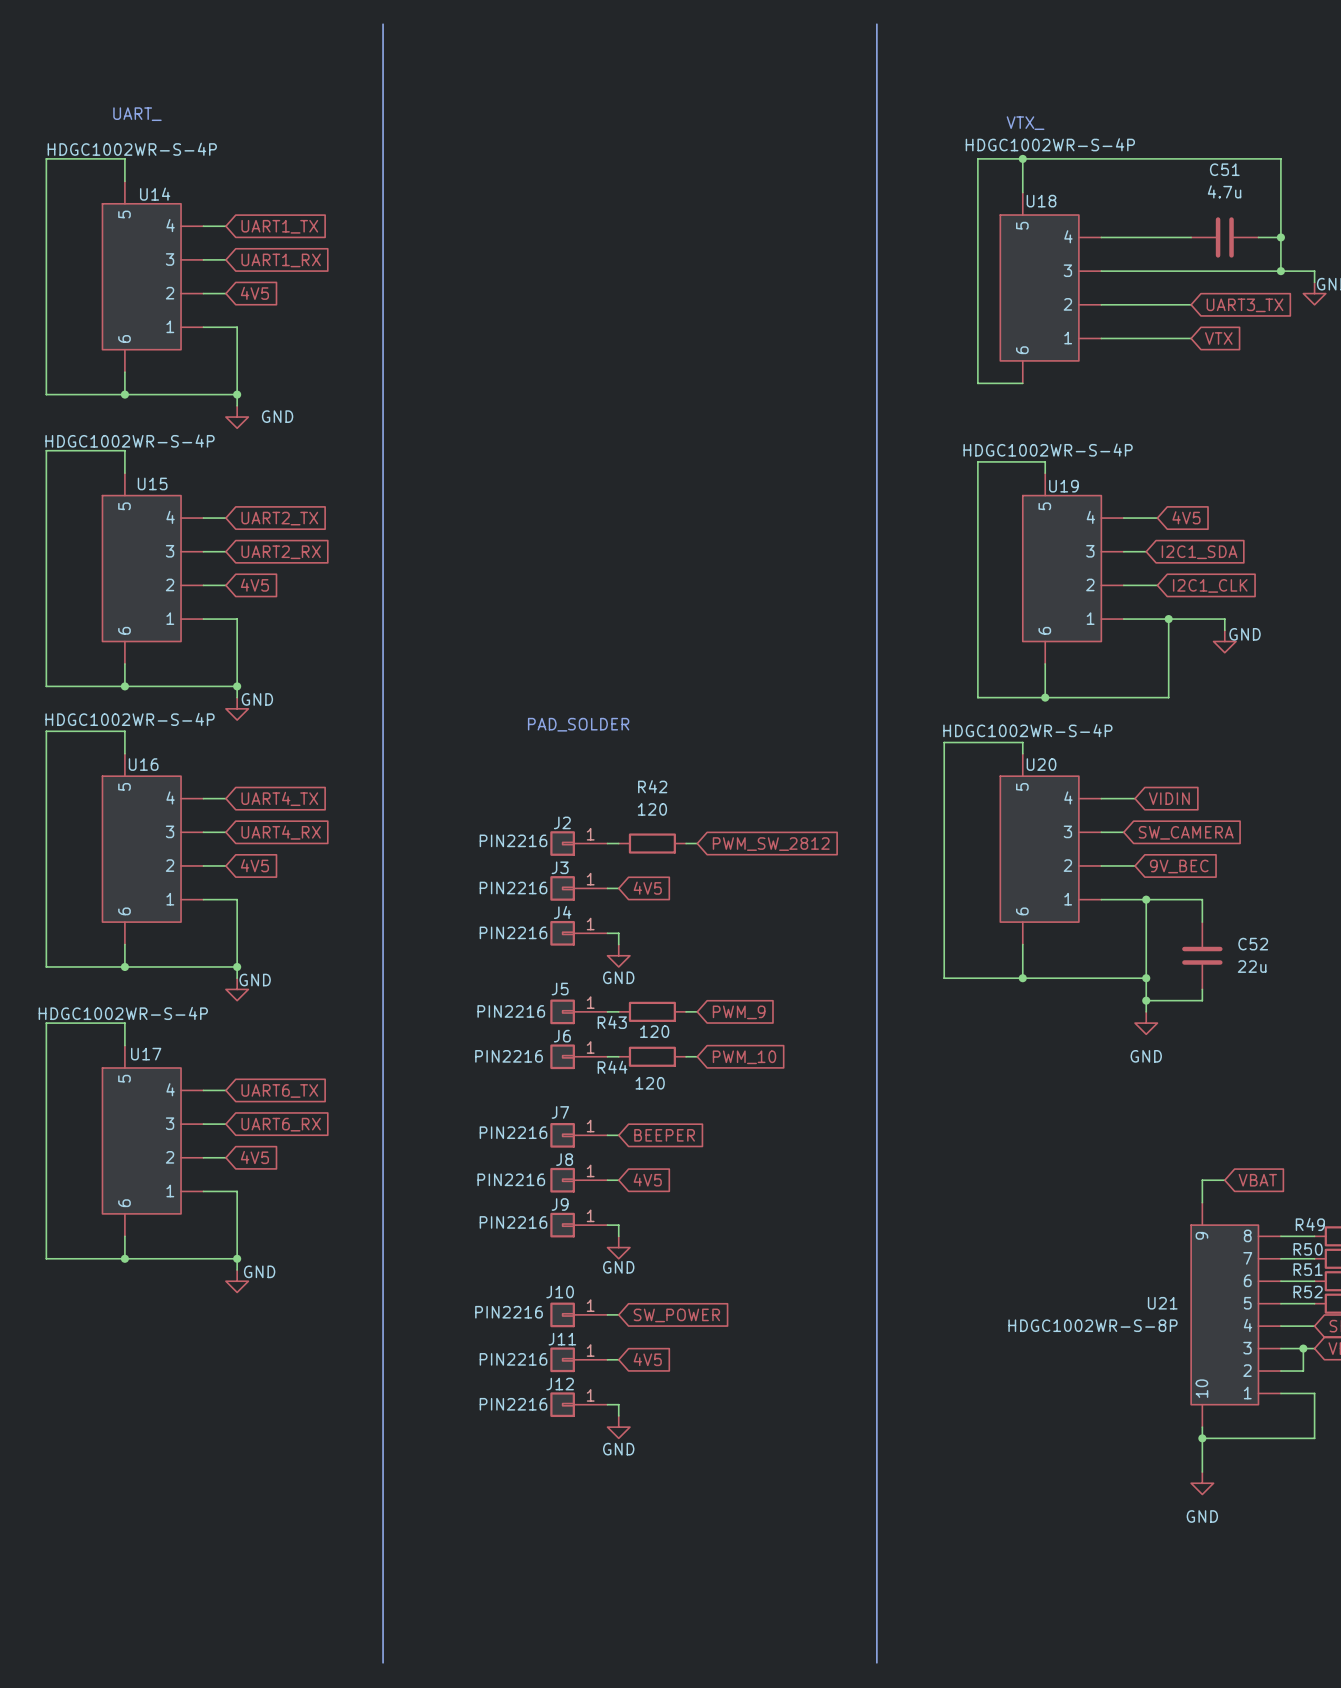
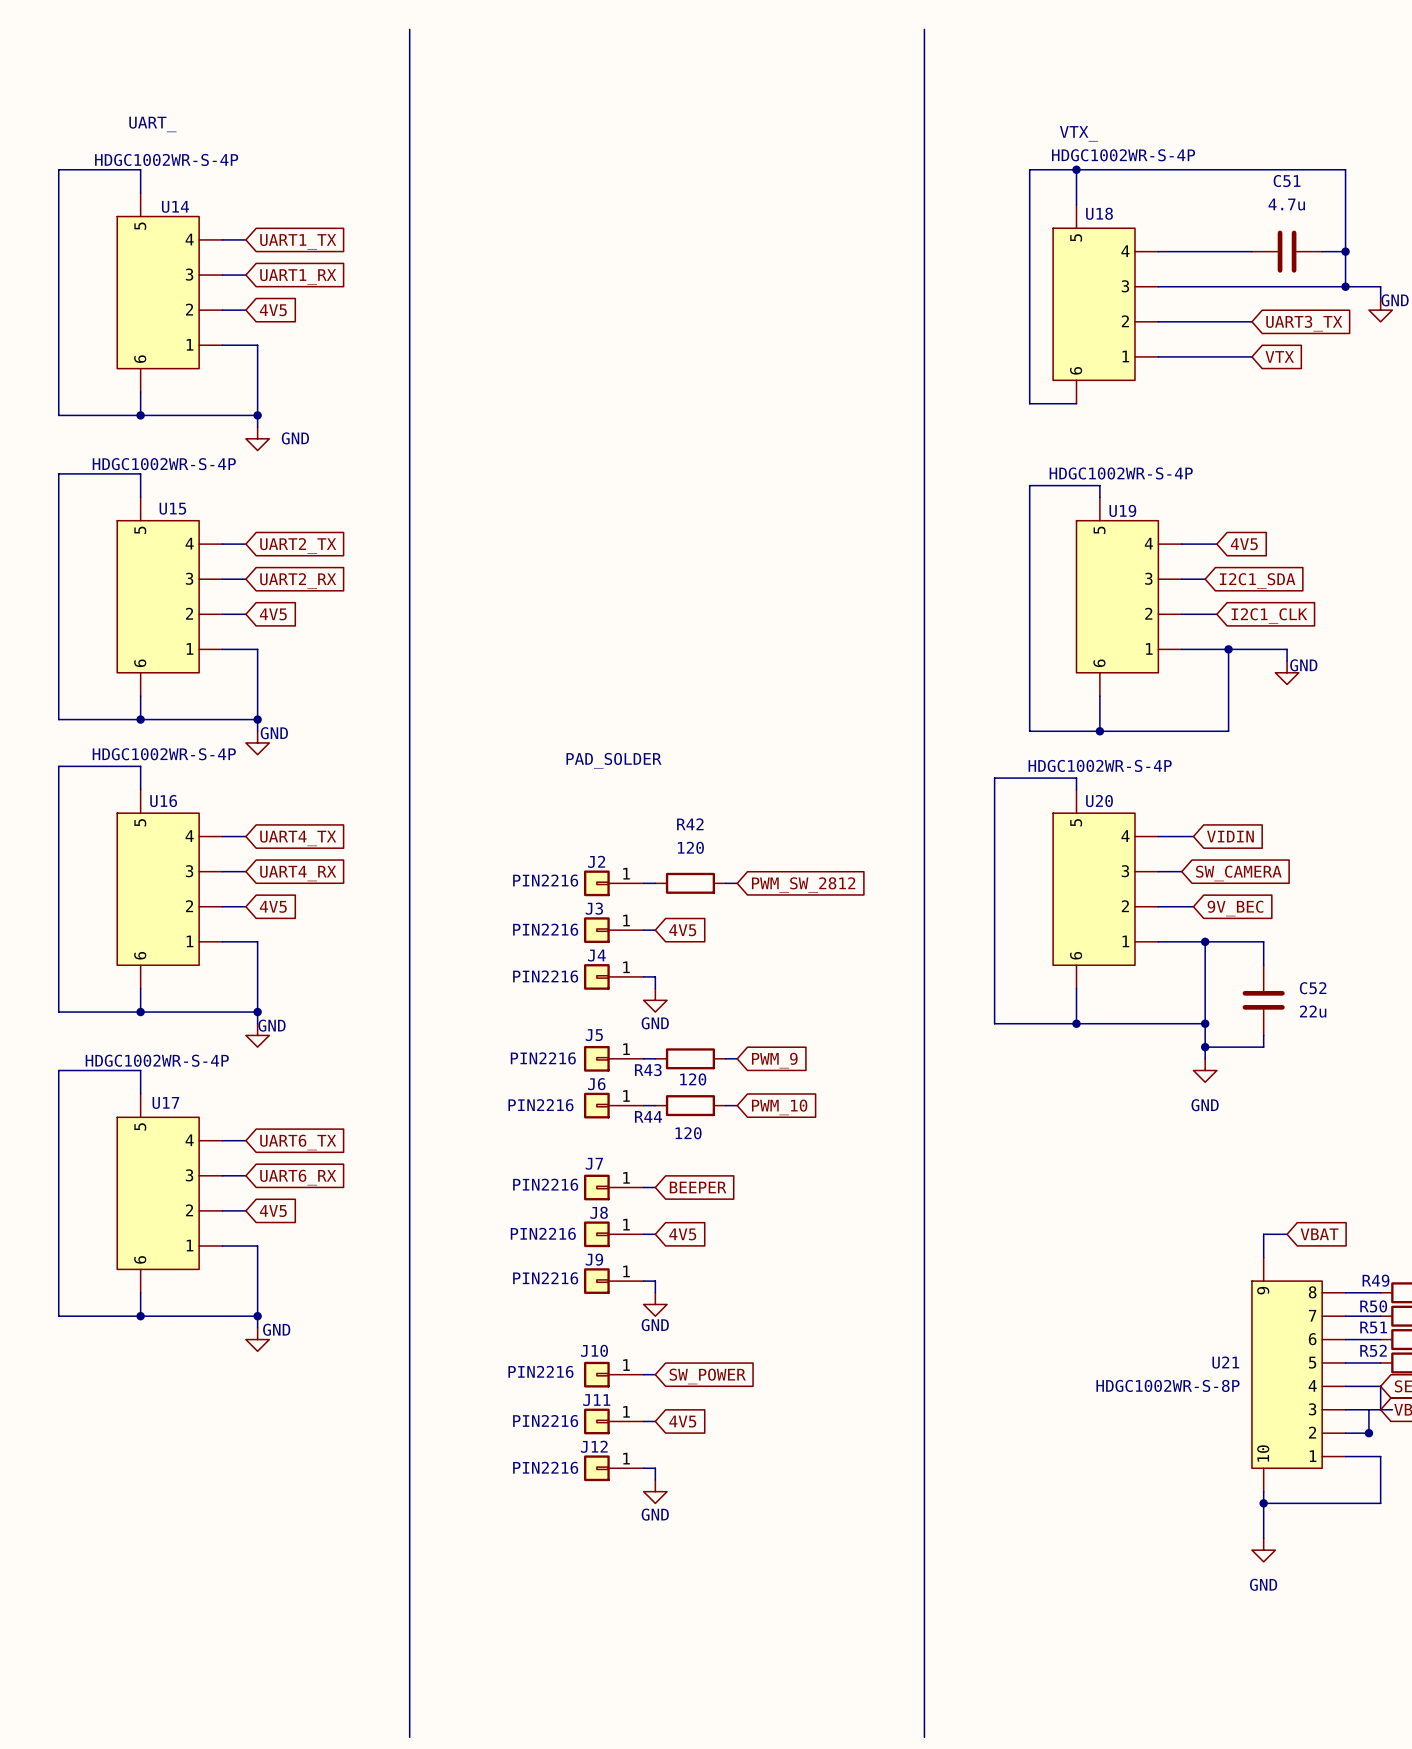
wire: none -> (1380, 1386) (1380, 1409) (1392, 1409)
junction position: (1303, 1348) -> (1368, 1433)

